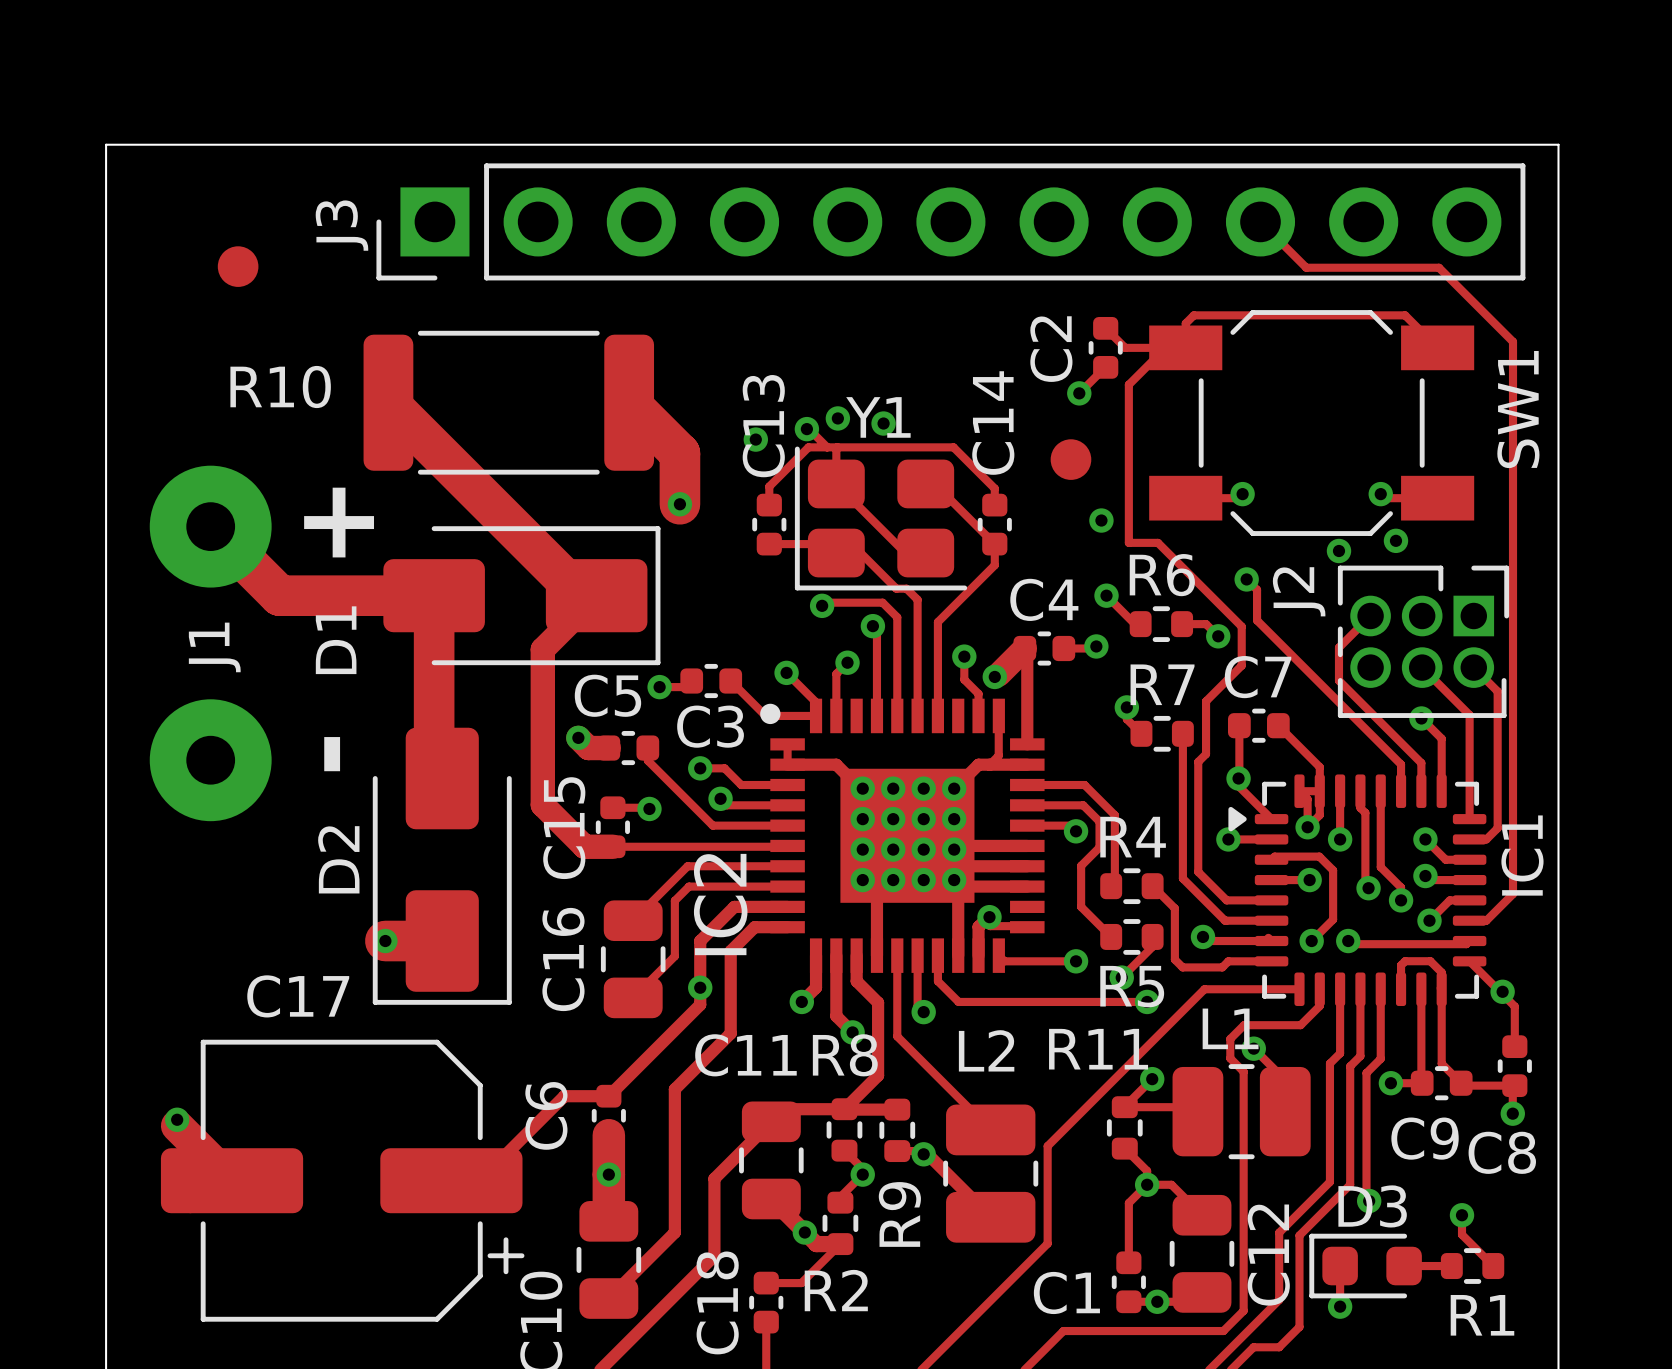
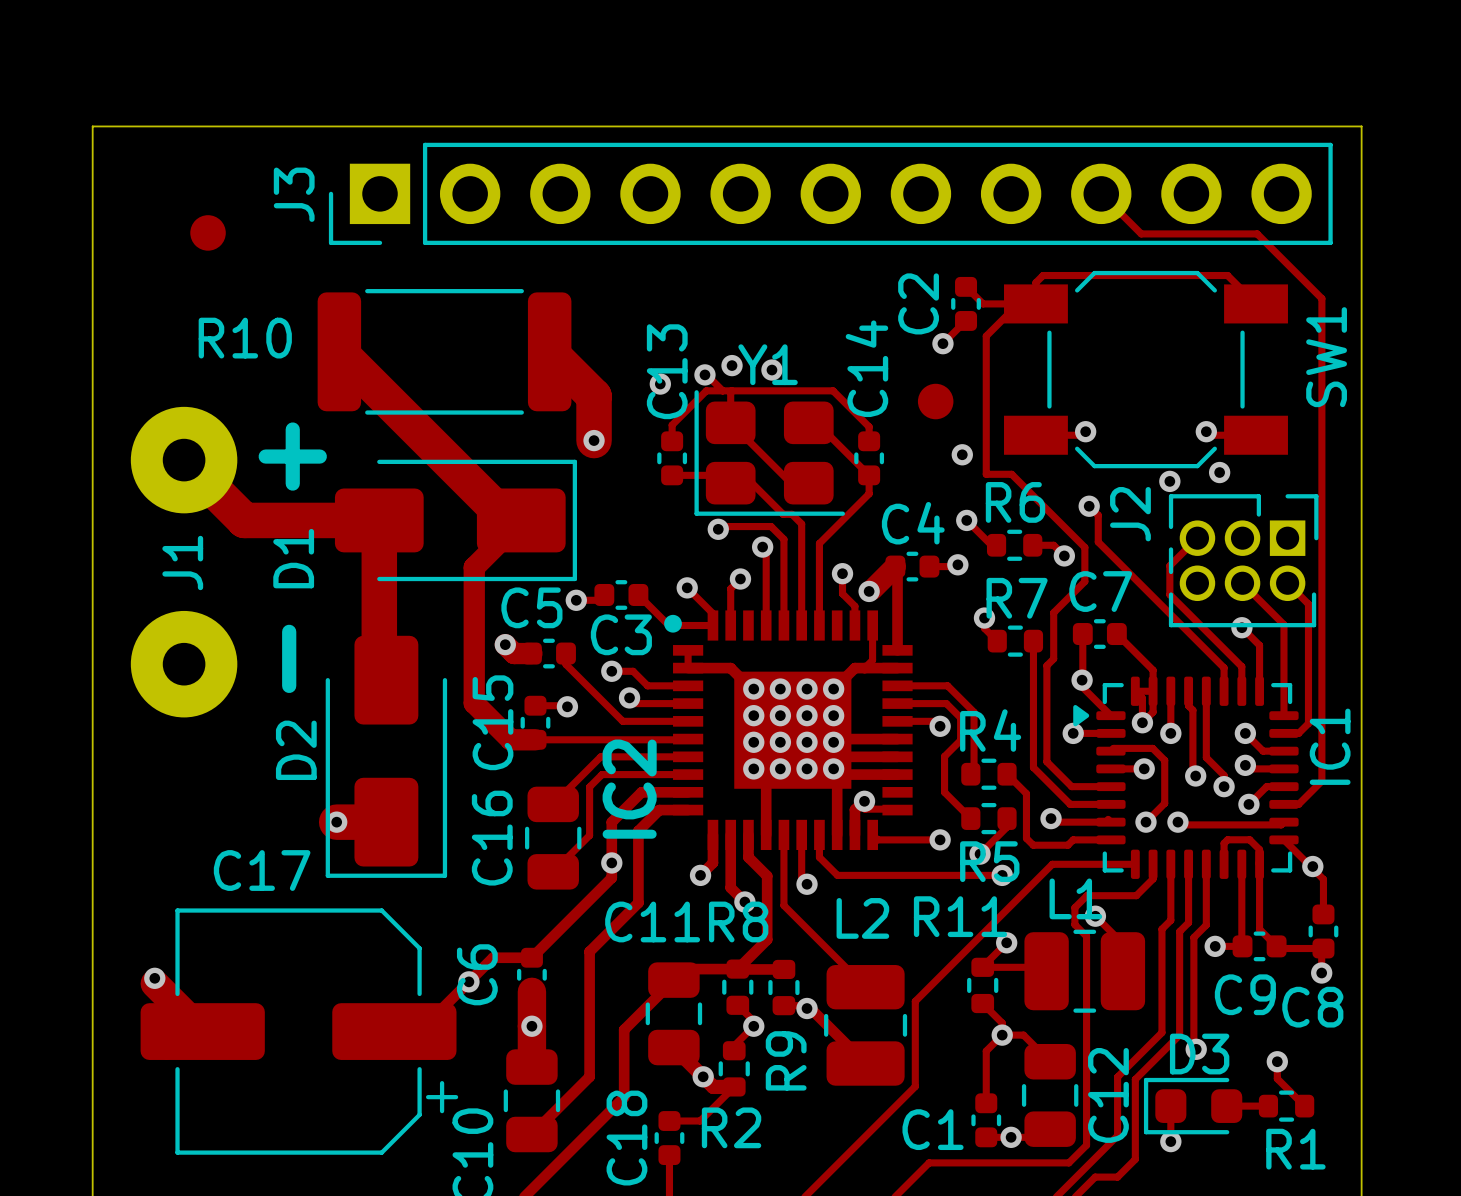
via: none -> (468, 981)

